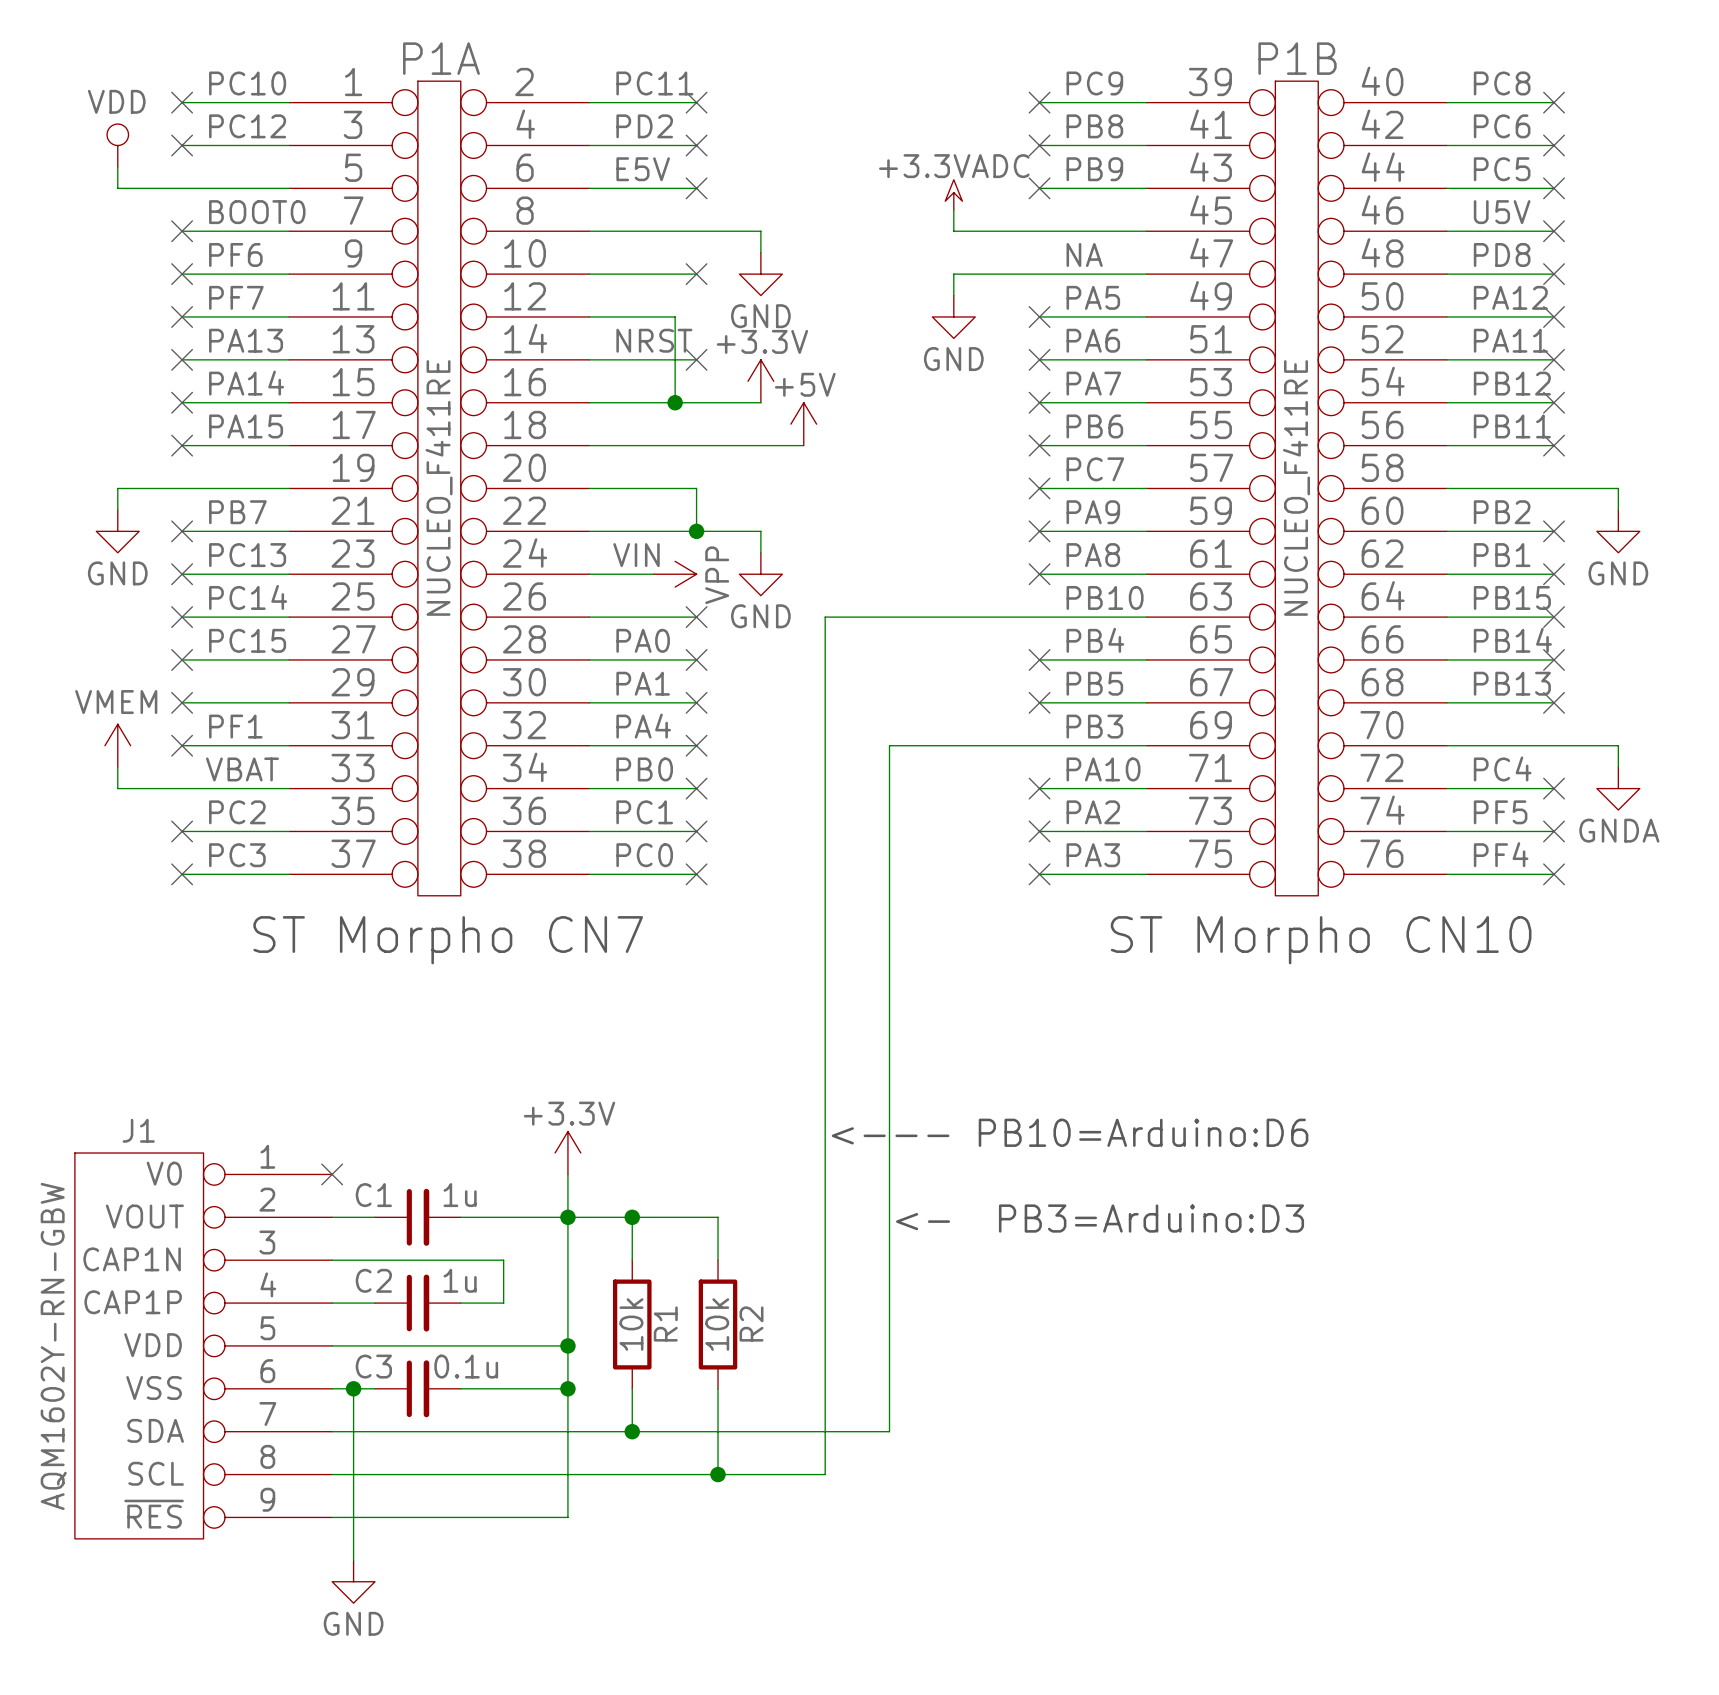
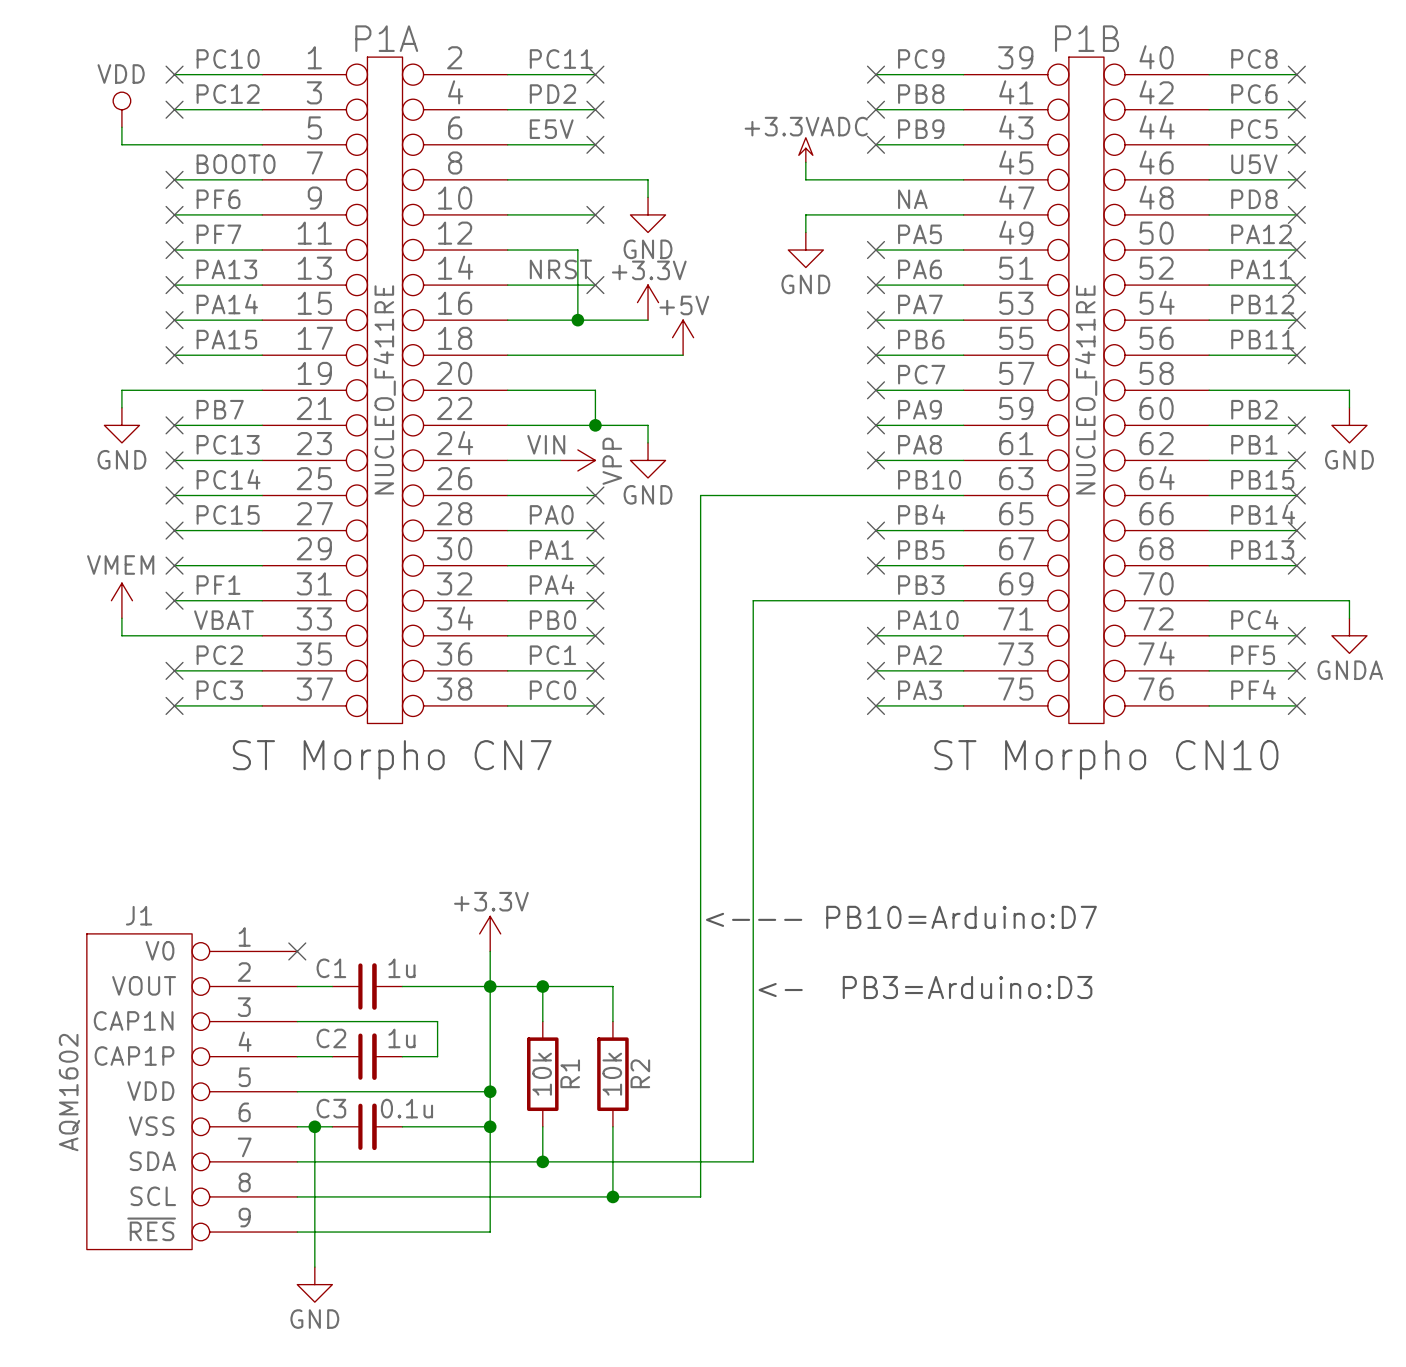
text: <--- PB10=Arduino:D6 (1070, 1132) -> <--- PB10=Arduino:D7 (901, 917)
J1 value: AQM1602Y-RN-GBW (53, 1346) -> AQM1602 (69, 1092)

